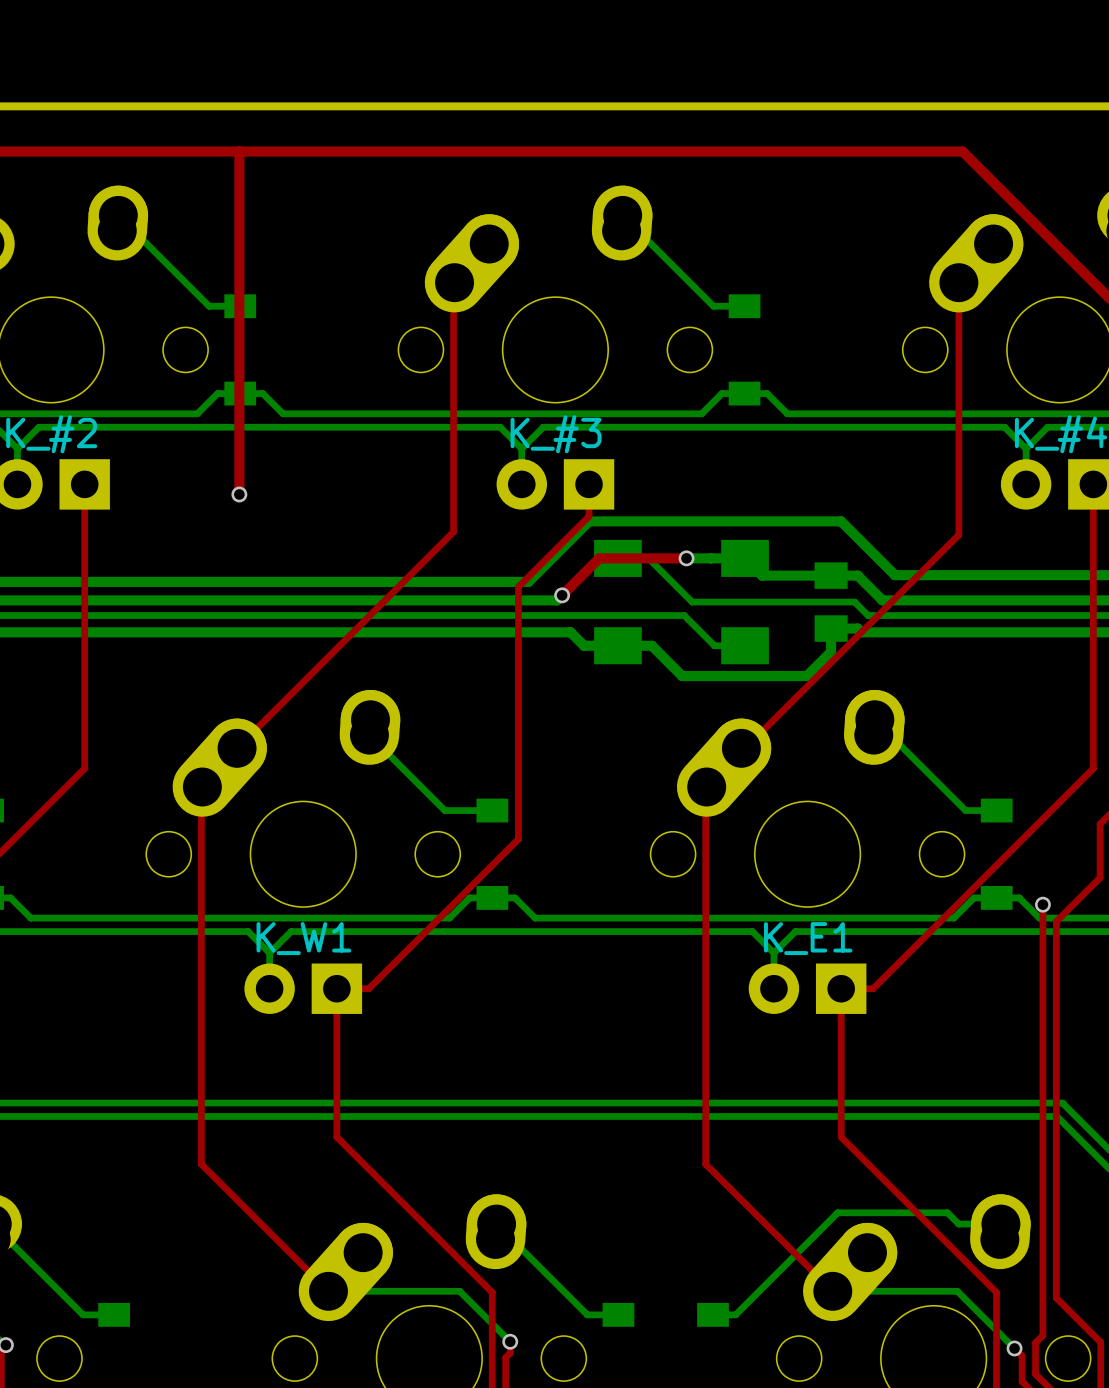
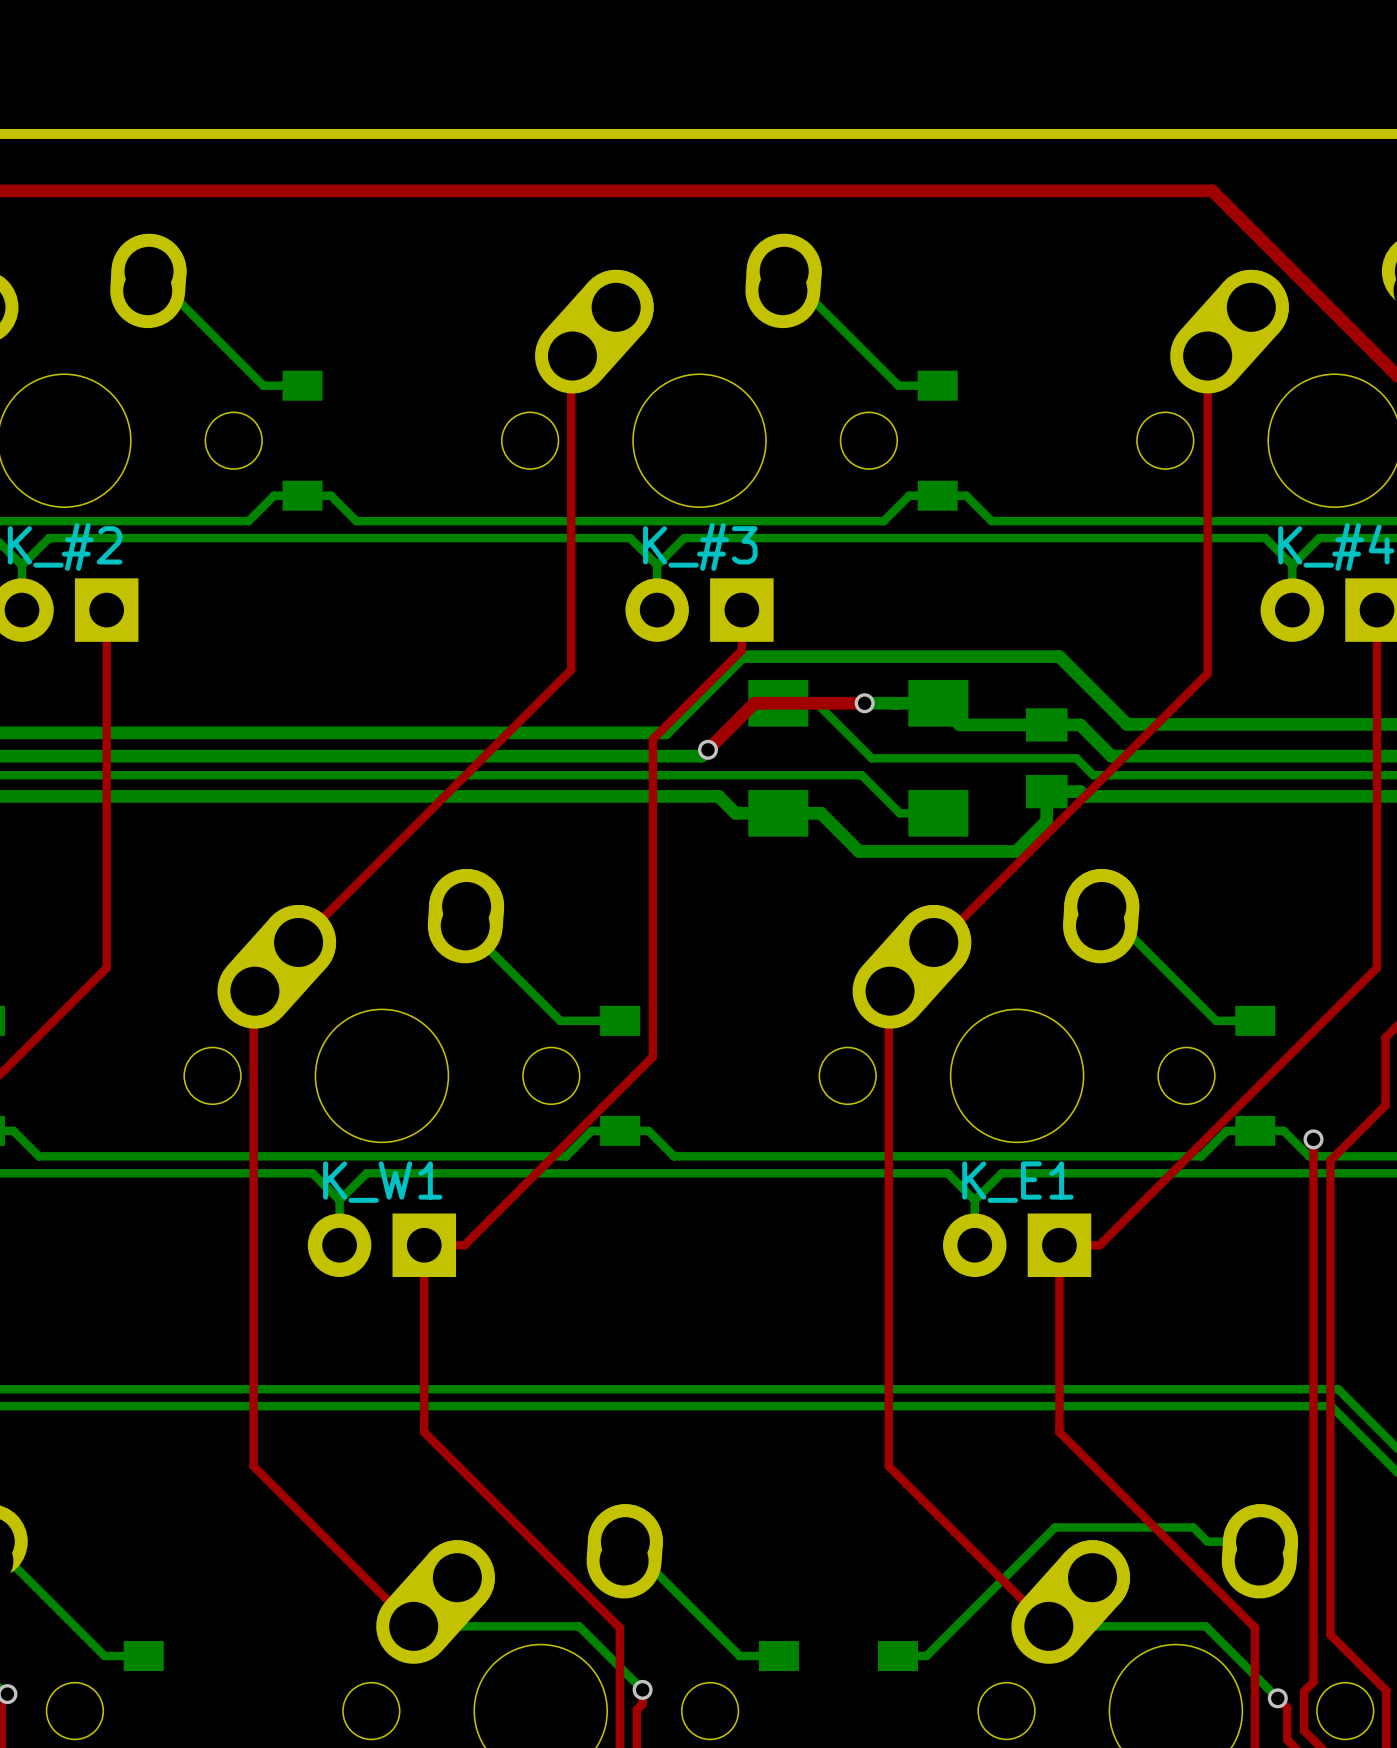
top track: (239, 151) (239, 494) -> none
via: (239, 494) -> none

